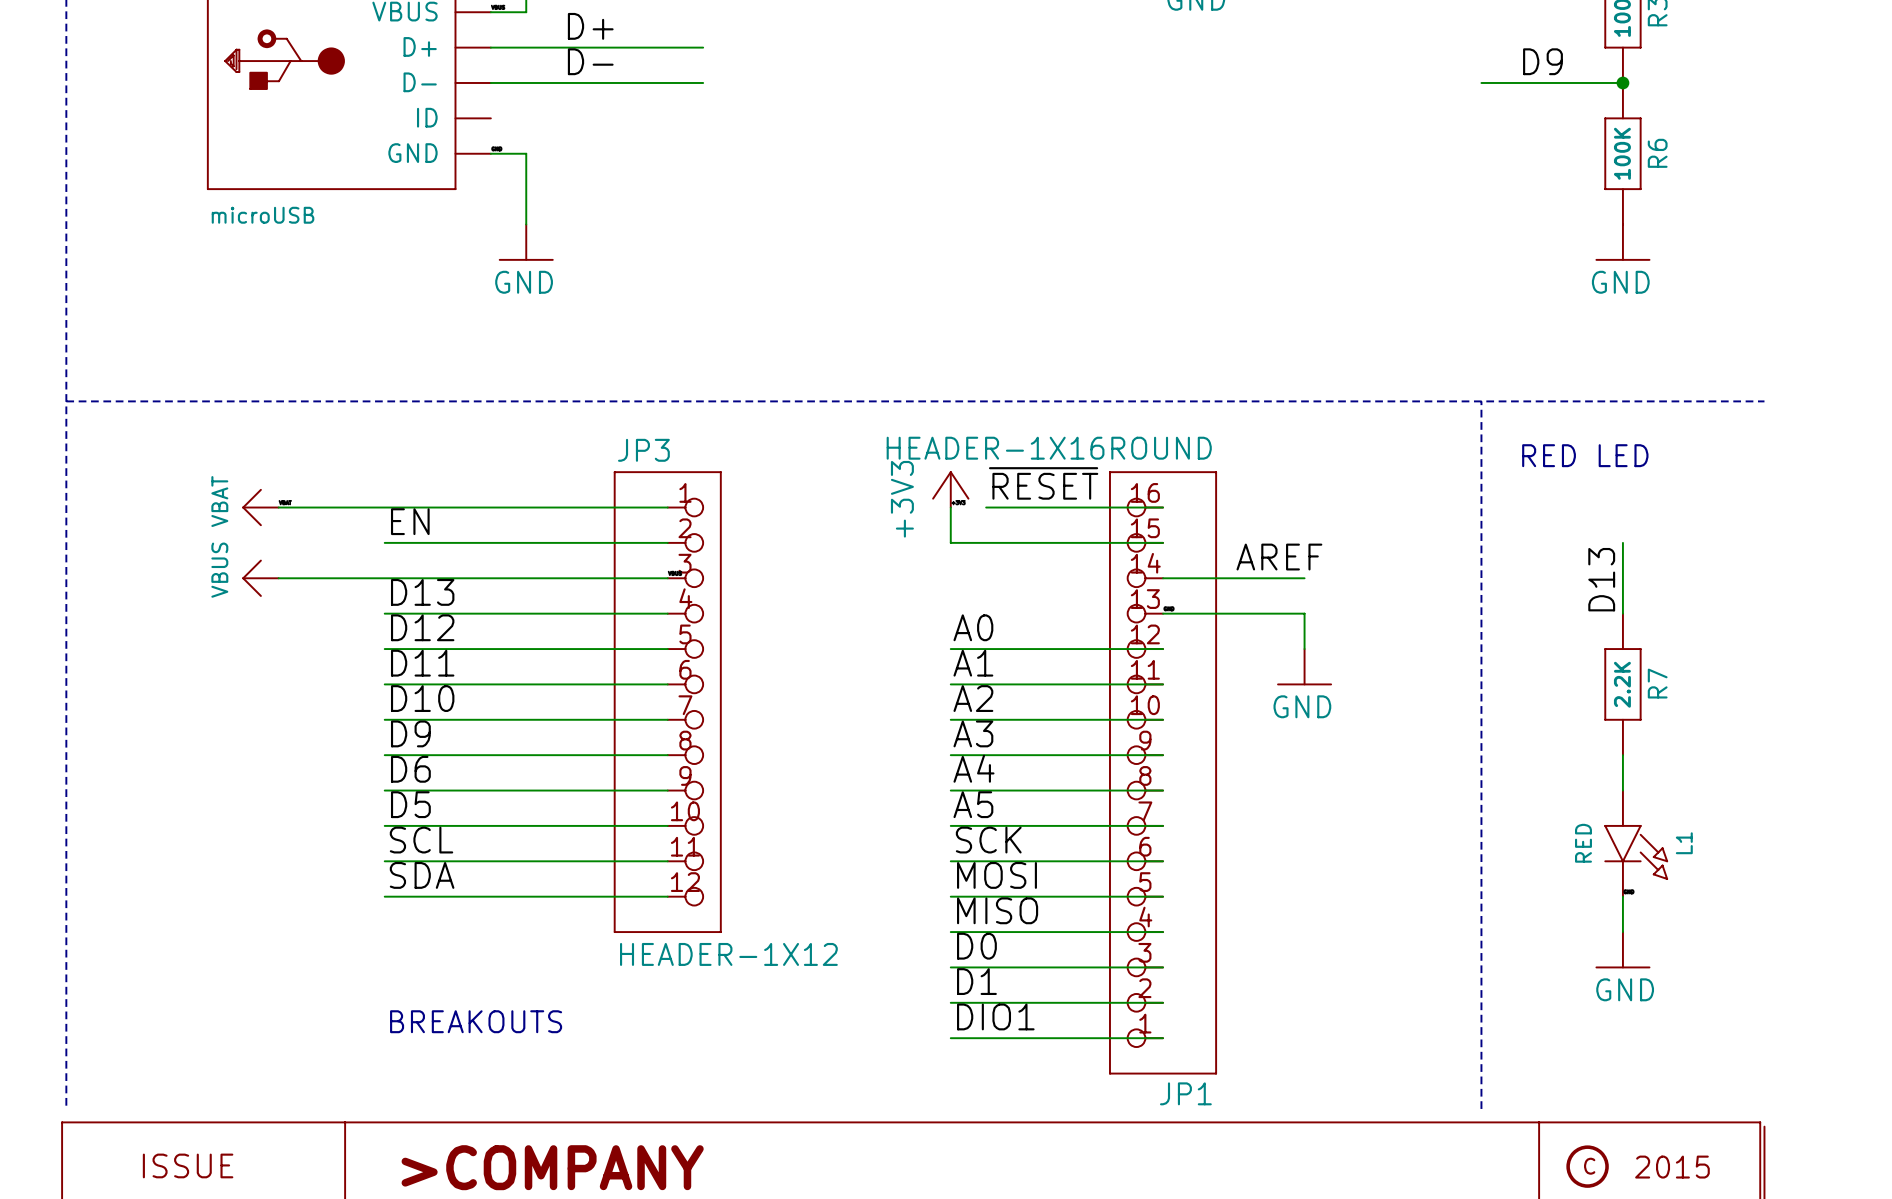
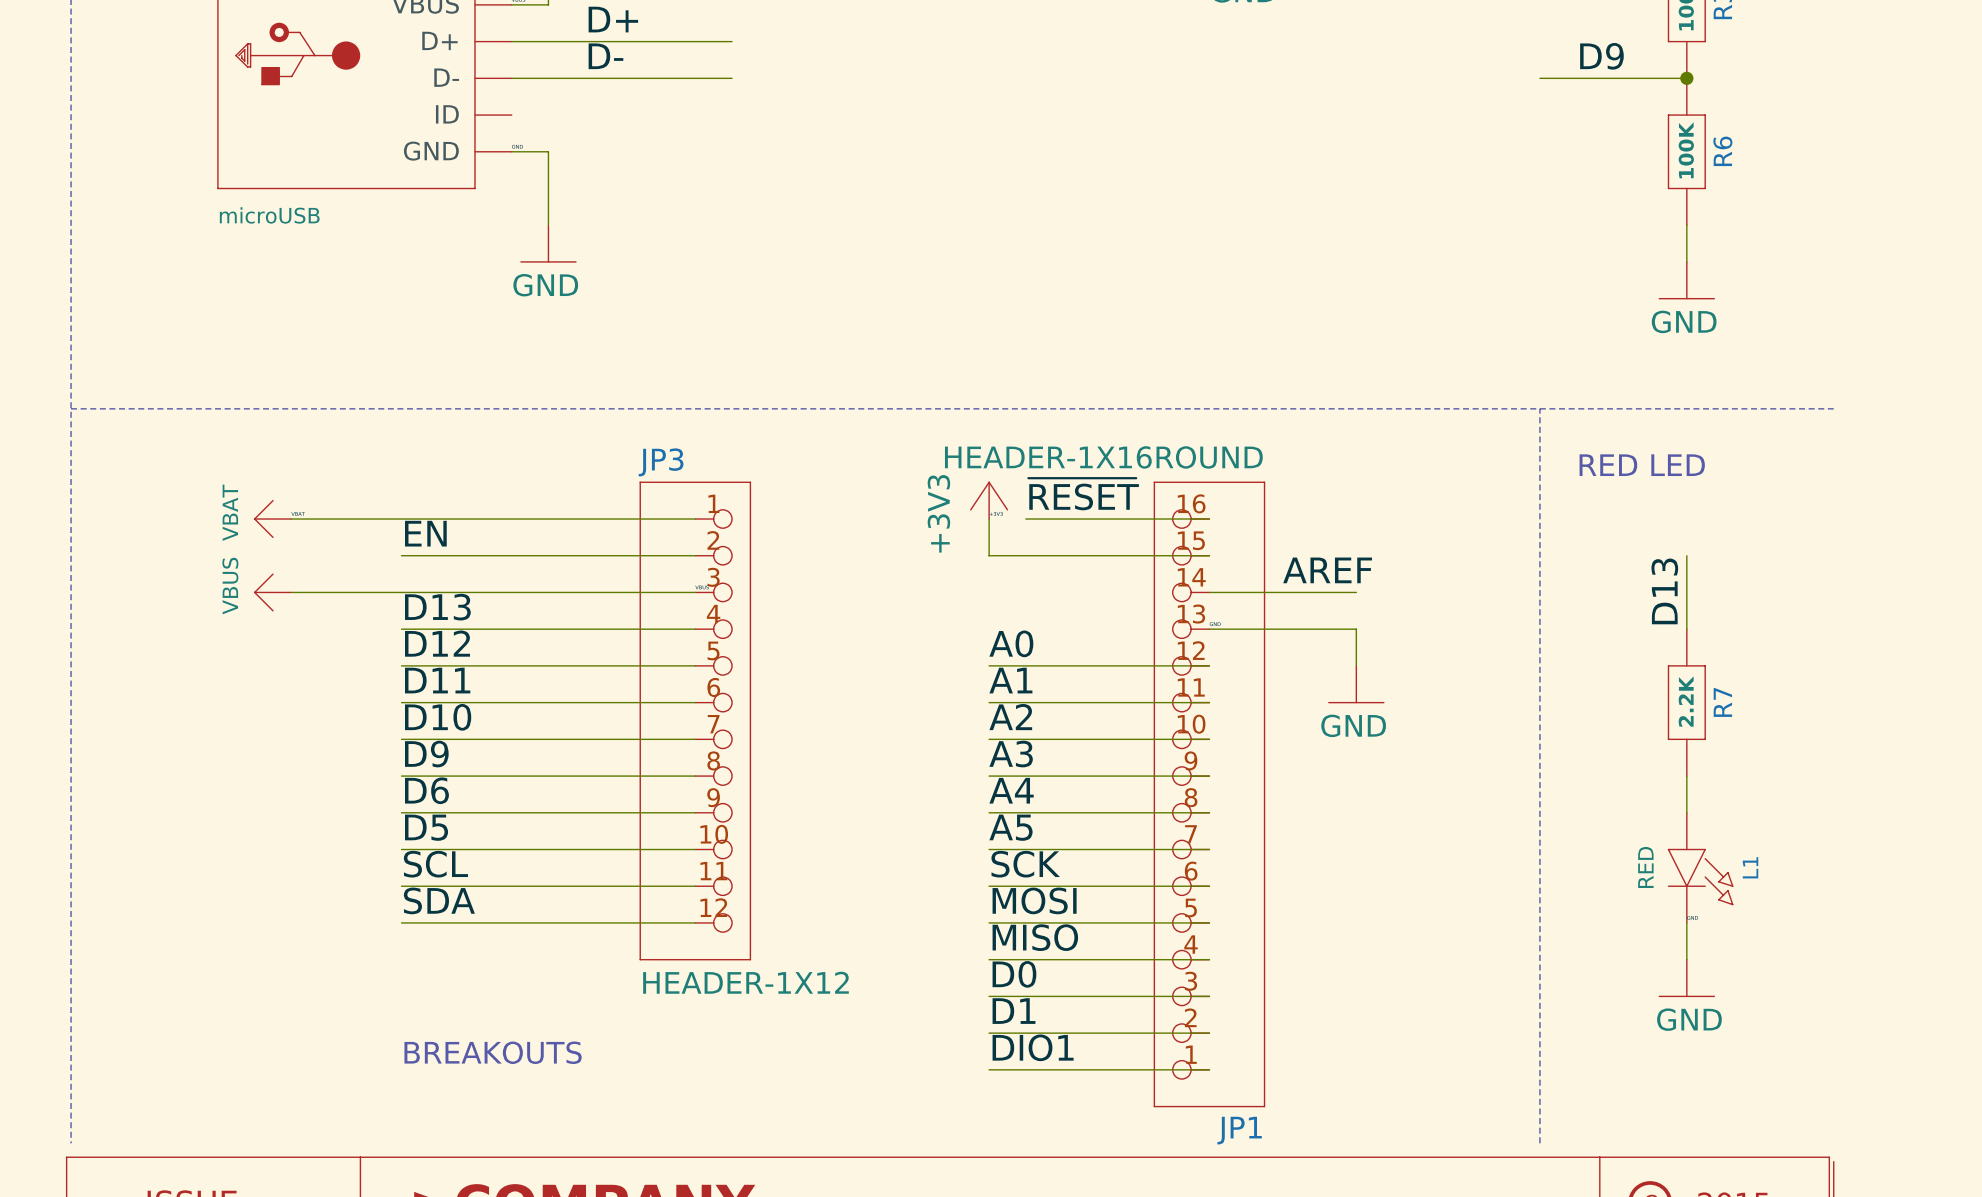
power symbol position: GND (1622, 242) -> GND (1686, 280)

